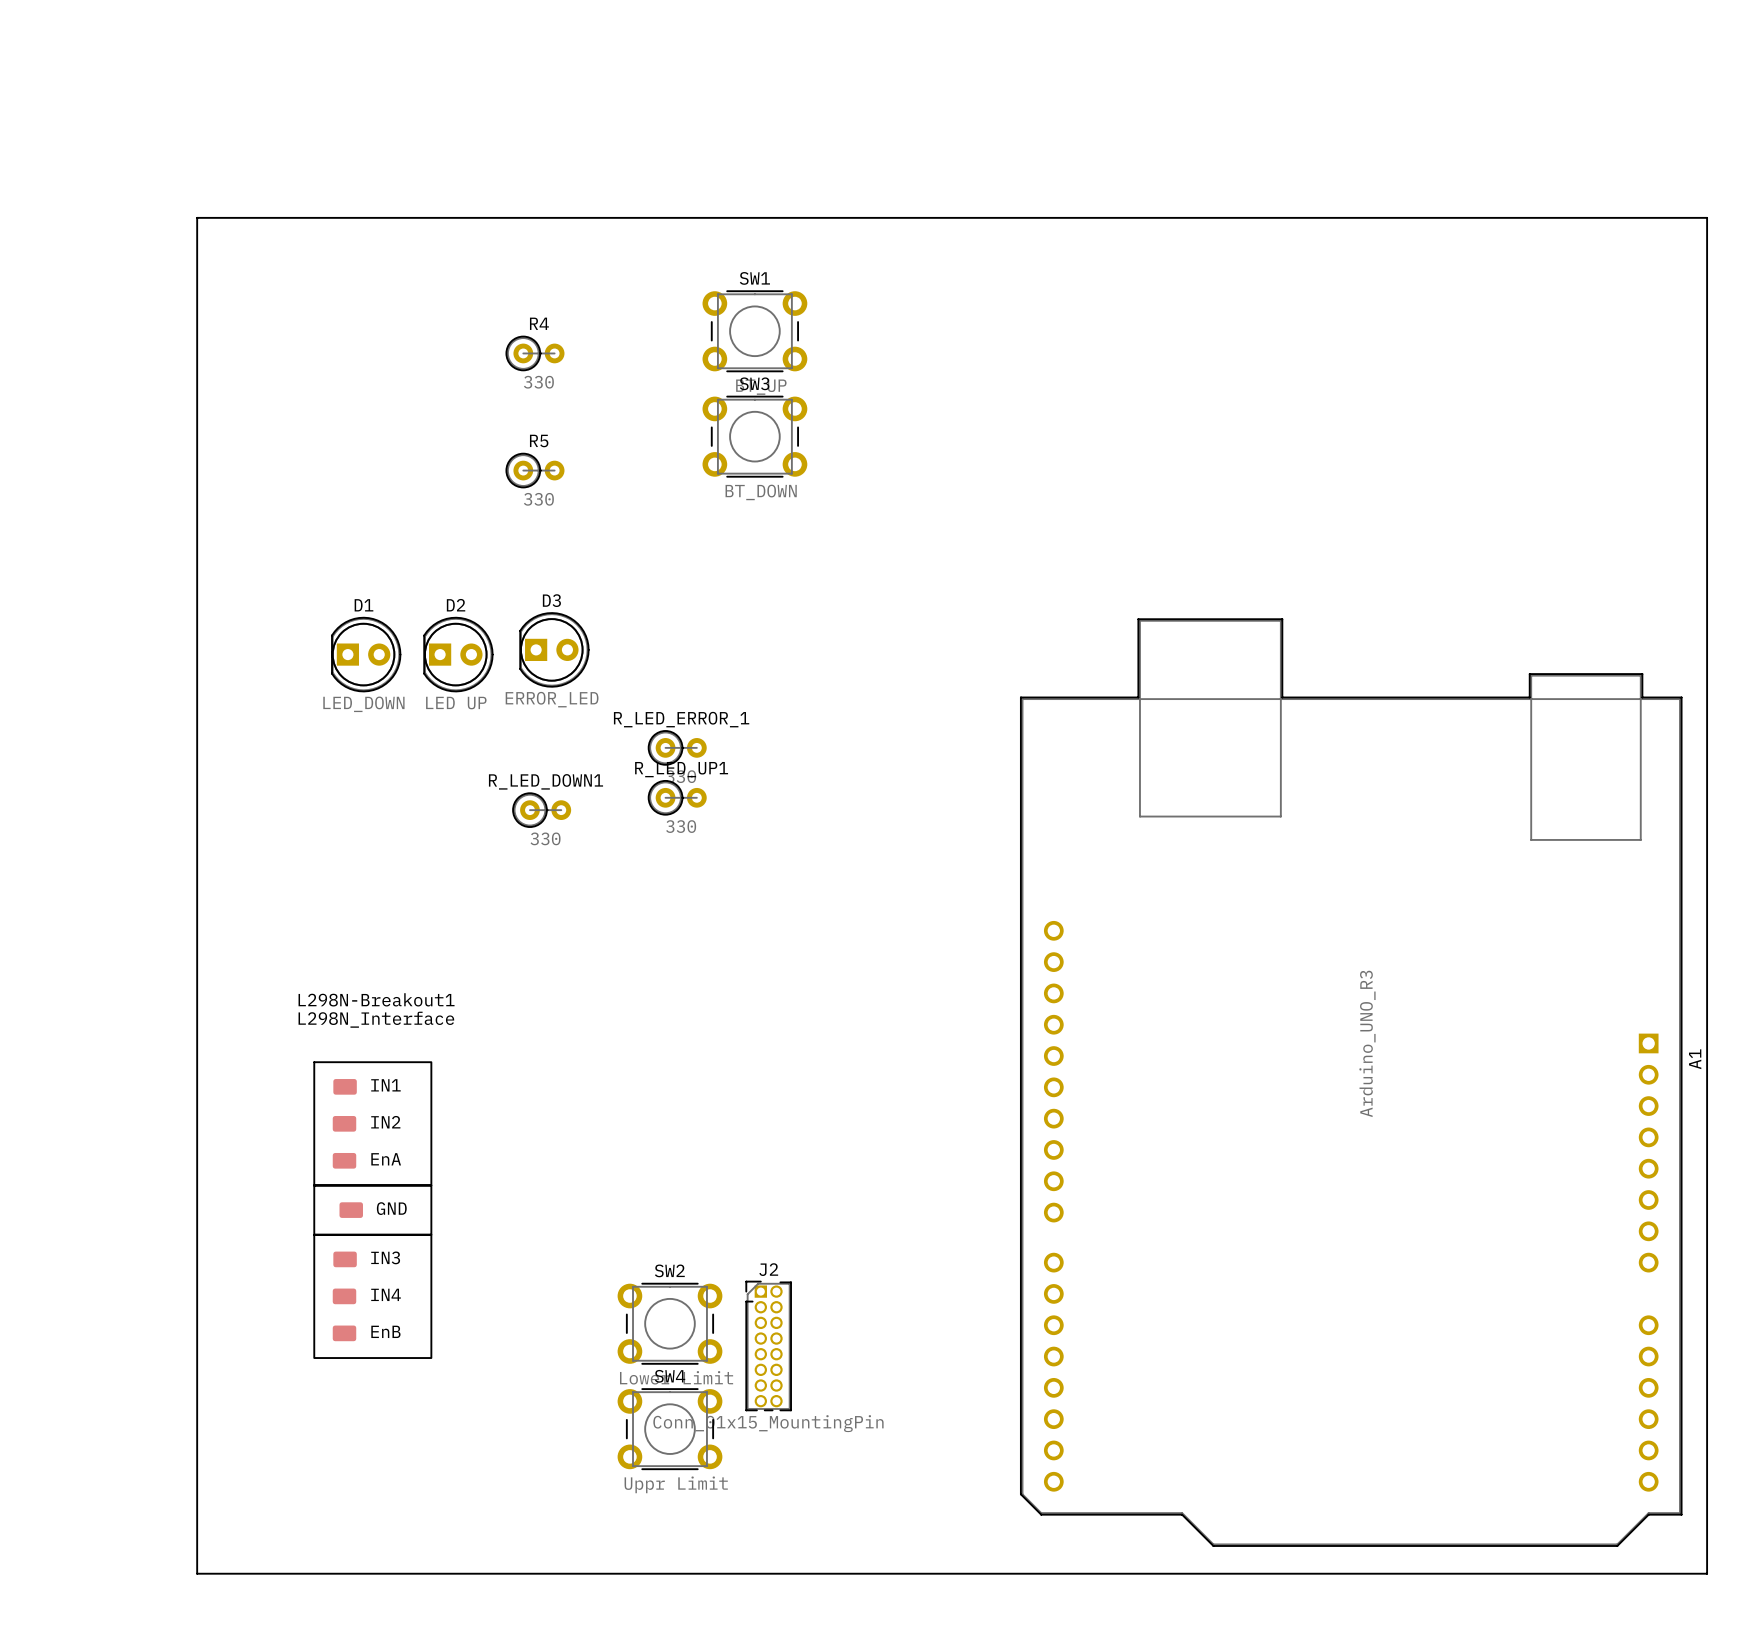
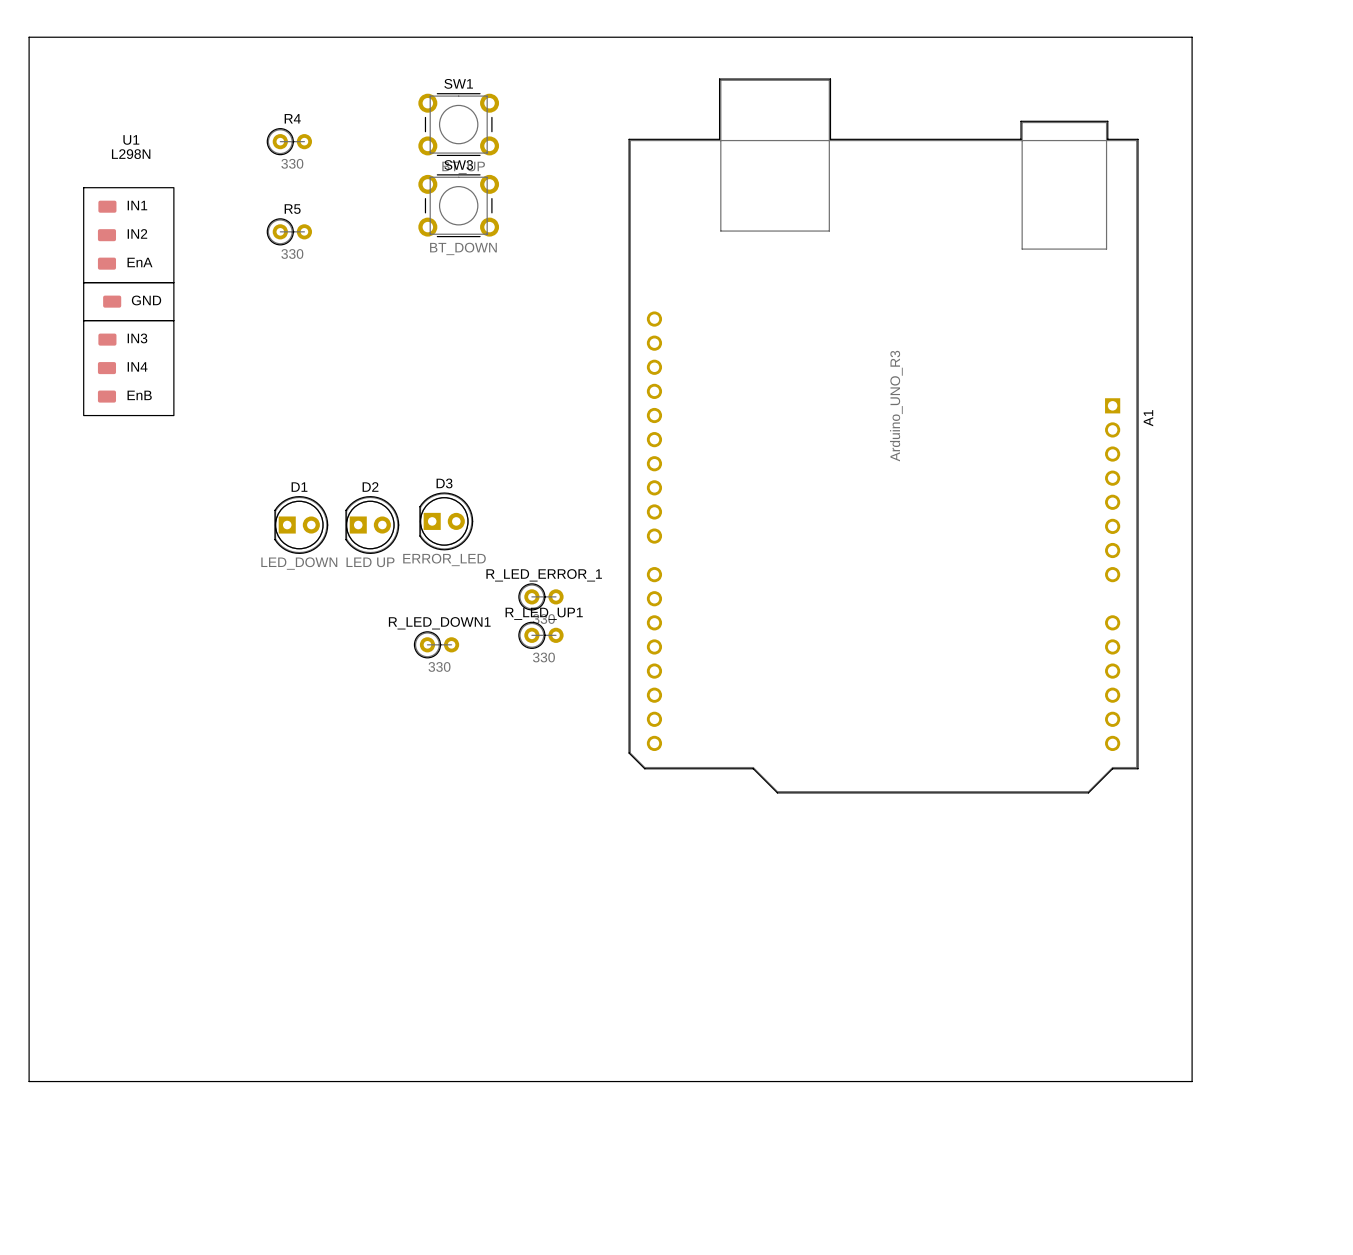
board edge: (197, 217) (197, 1573) (1707, 1573) (1707, 217) (197, 217) -> (29, 37) (29, 1081) (1192, 1081) (1192, 37) (29, 37)
SW1 position: (754, 331) -> (458, 124)
R4 position: (535, 353) -> (289, 141)
U1: none -> L298N (128, 301)
SW3 position: (754, 436) -> (458, 205)
R5 position: (535, 470) -> (289, 231)
A1 position: (1351, 1082) -> (883, 435)
L298N-Breakout1: L298N_Interface (372, 1210) -> none
SW2: Lower Limit (669, 1323) -> none
J2: Conn_01x15_MountingPin (768, 1345) -> none
SW4: Uppr Limit (669, 1429) -> none

